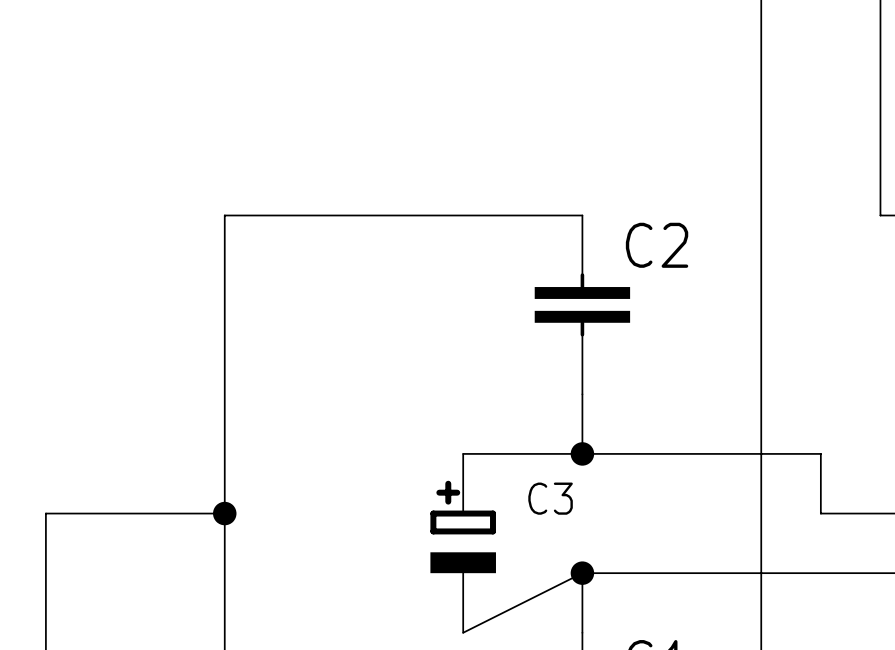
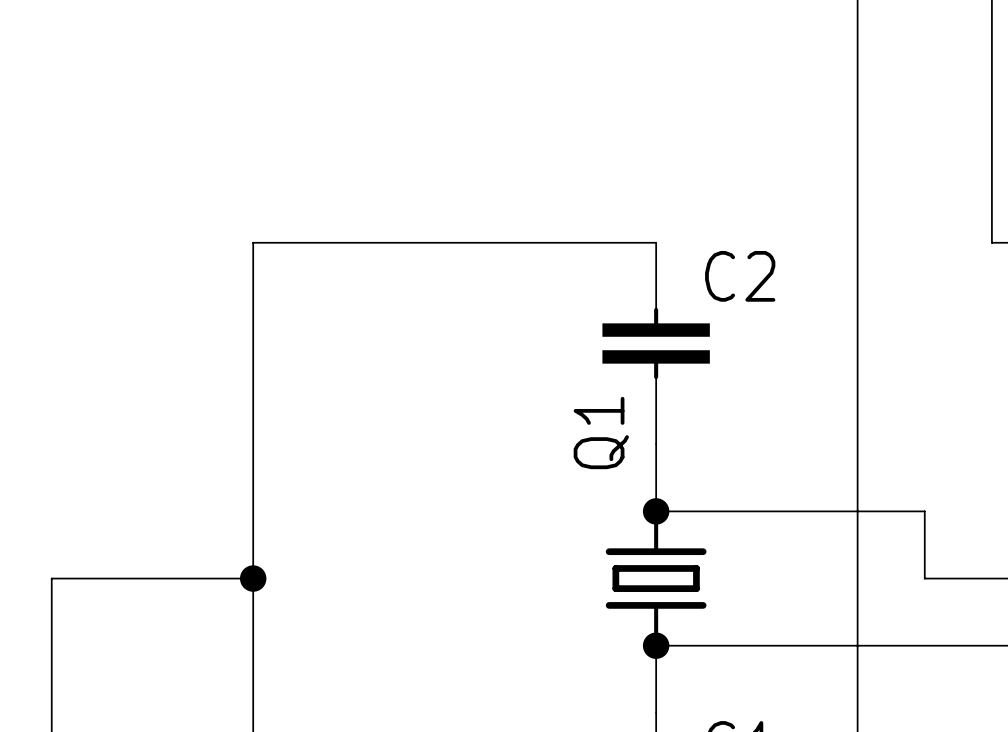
wire: (463, 453) (582, 453) -> none
Q1: none -> (656, 578)
C3: (463, 543) -> none
wire: (582, 573) (463, 632) -> none

